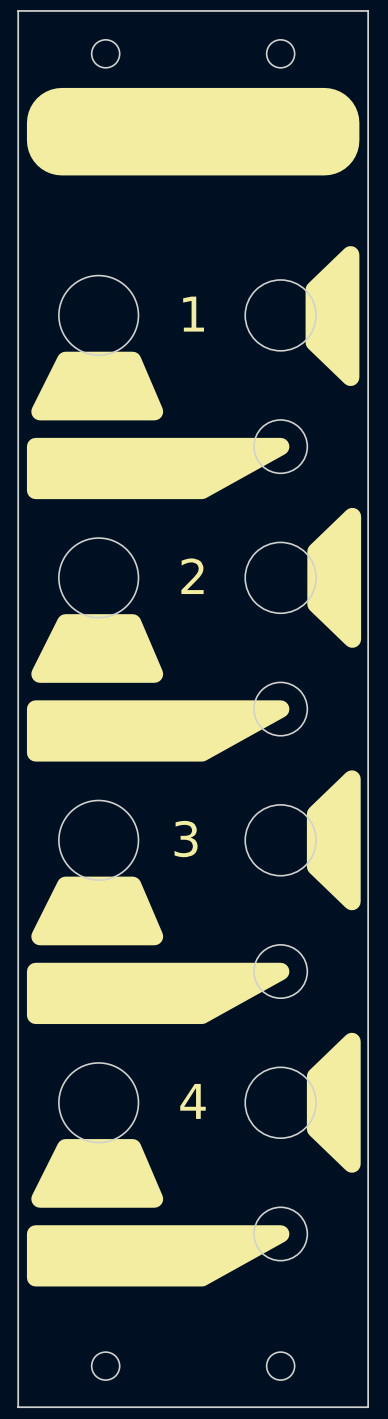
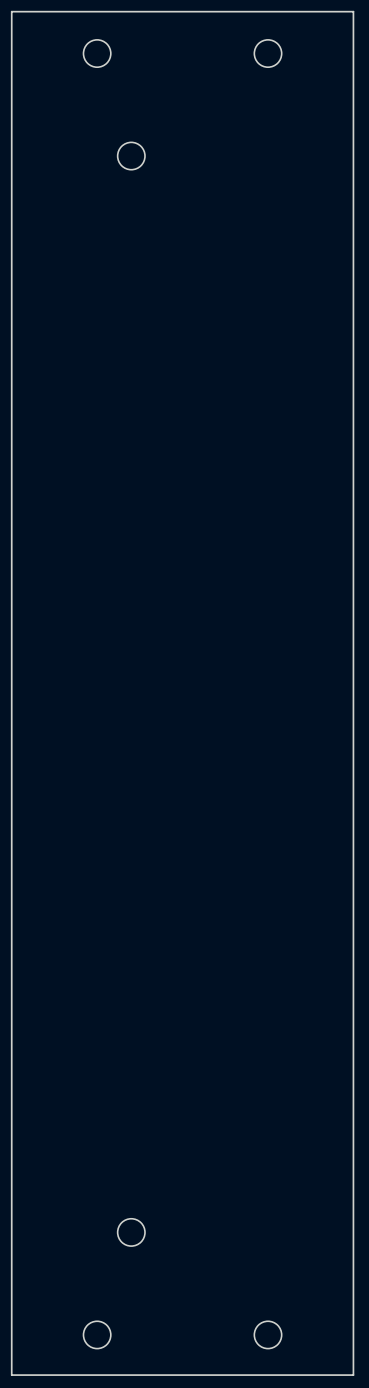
drawing: [26, 87, 360, 176] -> none
round board edge: none -> [117, 142, 146, 170]
drawing: [305, 246, 360, 387] -> none
round board edge: [58, 275, 139, 356] -> none
round board edge: [244, 279, 317, 352] -> none
text: 1 (193, 314) -> none
drawing: [31, 351, 164, 421] -> none
round board edge: [253, 419, 308, 474] -> none
drawing: [26, 437, 290, 500] -> none
drawing: [307, 507, 362, 648] -> none
round board edge: [58, 537, 139, 618] -> none
round board edge: [244, 542, 317, 614] -> none
text: 2 (192, 576) -> none
drawing: [31, 614, 164, 683] -> none
round board edge: [253, 681, 308, 737] -> none
drawing: [26, 700, 290, 762] -> none
drawing: [306, 770, 361, 911] -> none
round board edge: [58, 800, 139, 881] -> none
round board edge: [244, 804, 317, 876] -> none
text: 3 (186, 839) -> none
drawing: [31, 876, 164, 946] -> none
round board edge: [253, 944, 308, 999] -> none
drawing: [26, 962, 290, 1025] -> none
drawing: [306, 1032, 361, 1173] -> none
round board edge: [58, 1062, 139, 1143] -> none
round board edge: [244, 1067, 317, 1139] -> none
text: 4 (192, 1101) -> none
drawing: [31, 1139, 164, 1208] -> none
round board edge: [253, 1206, 308, 1262] -> none
drawing: [26, 1225, 290, 1287] -> none
round board edge: none -> [117, 1218, 146, 1247]

